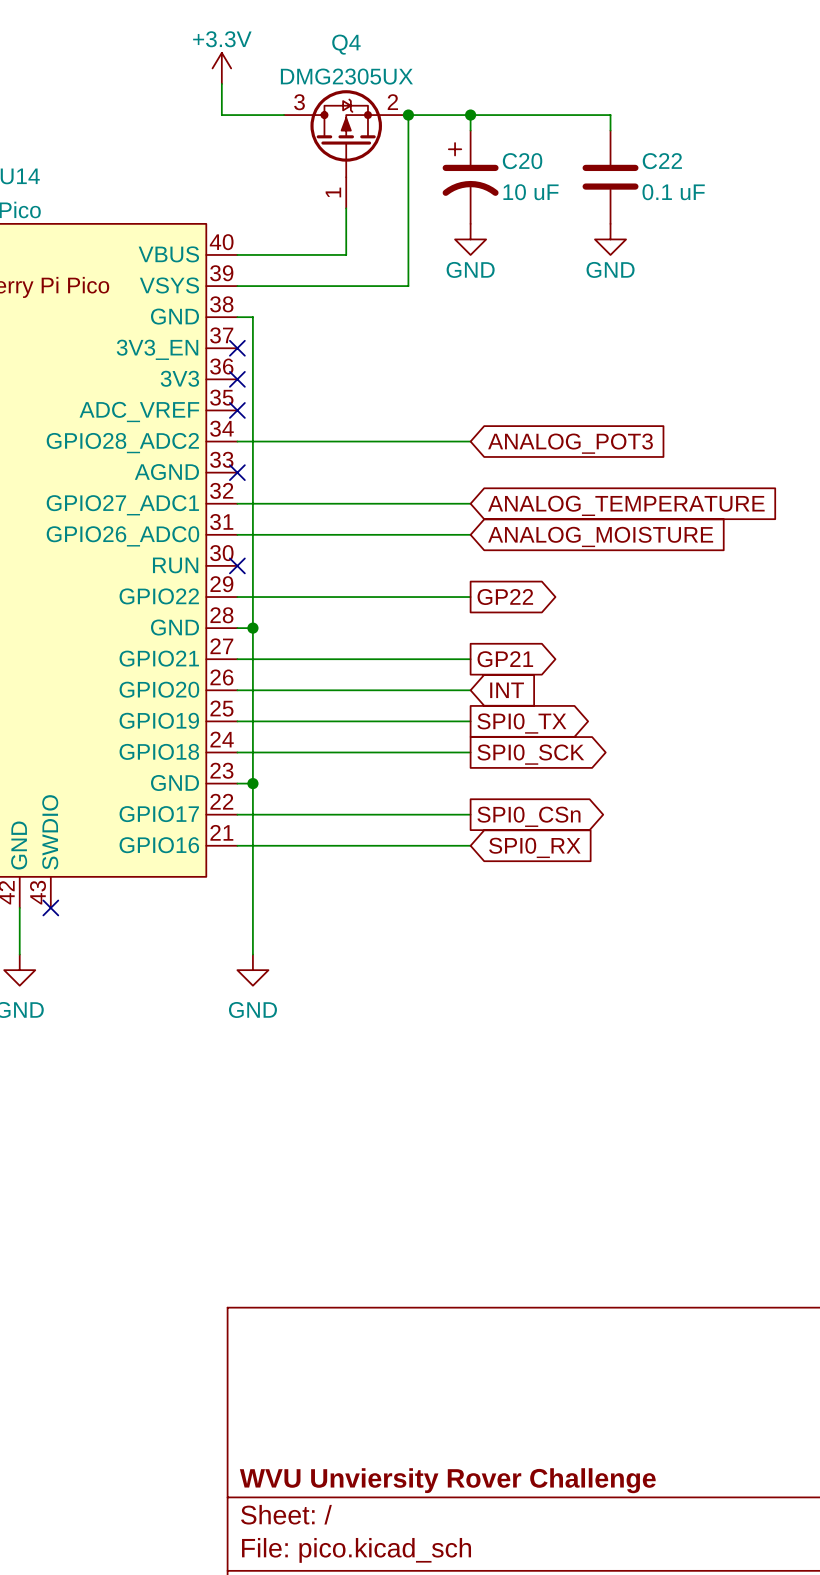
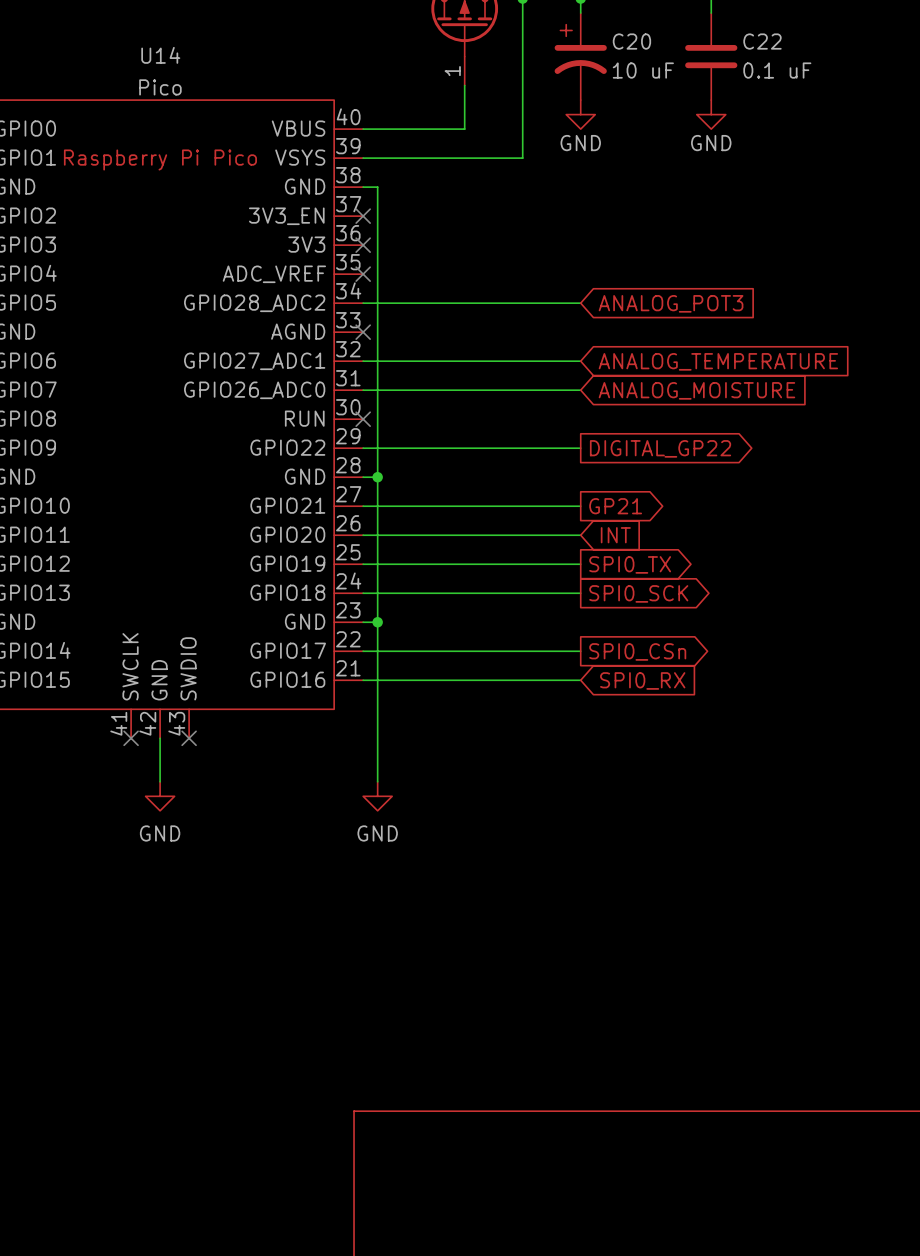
global label: GP22 (505, 597) -> DIGITAL_GP22 (660, 448)

